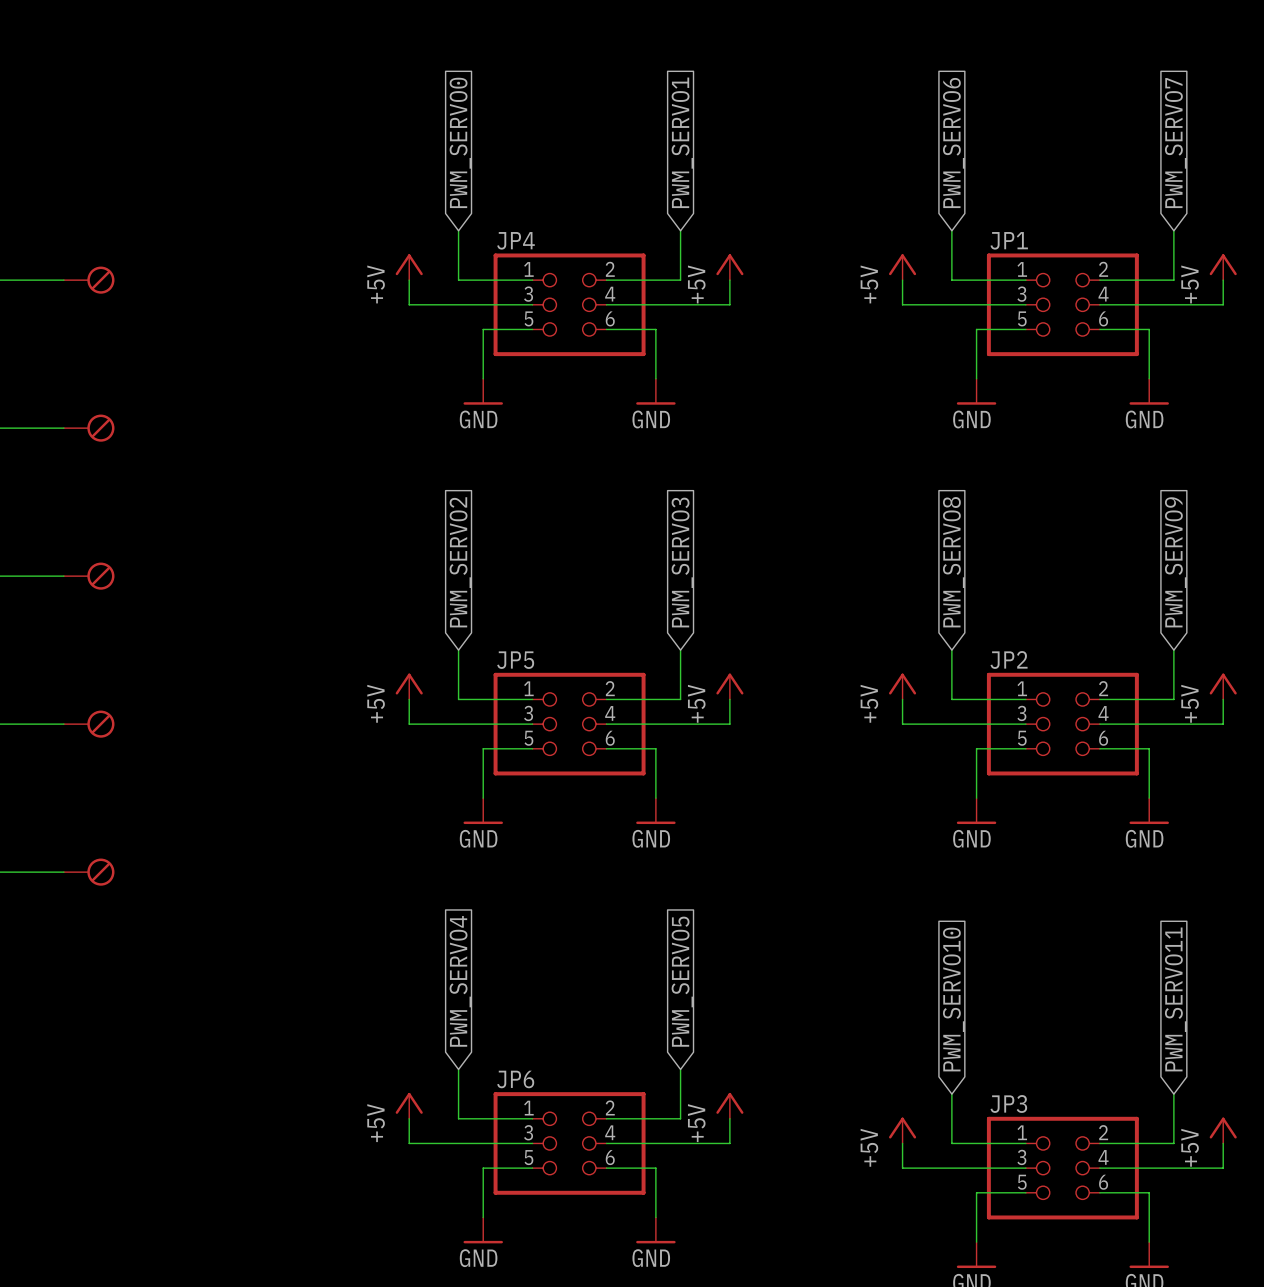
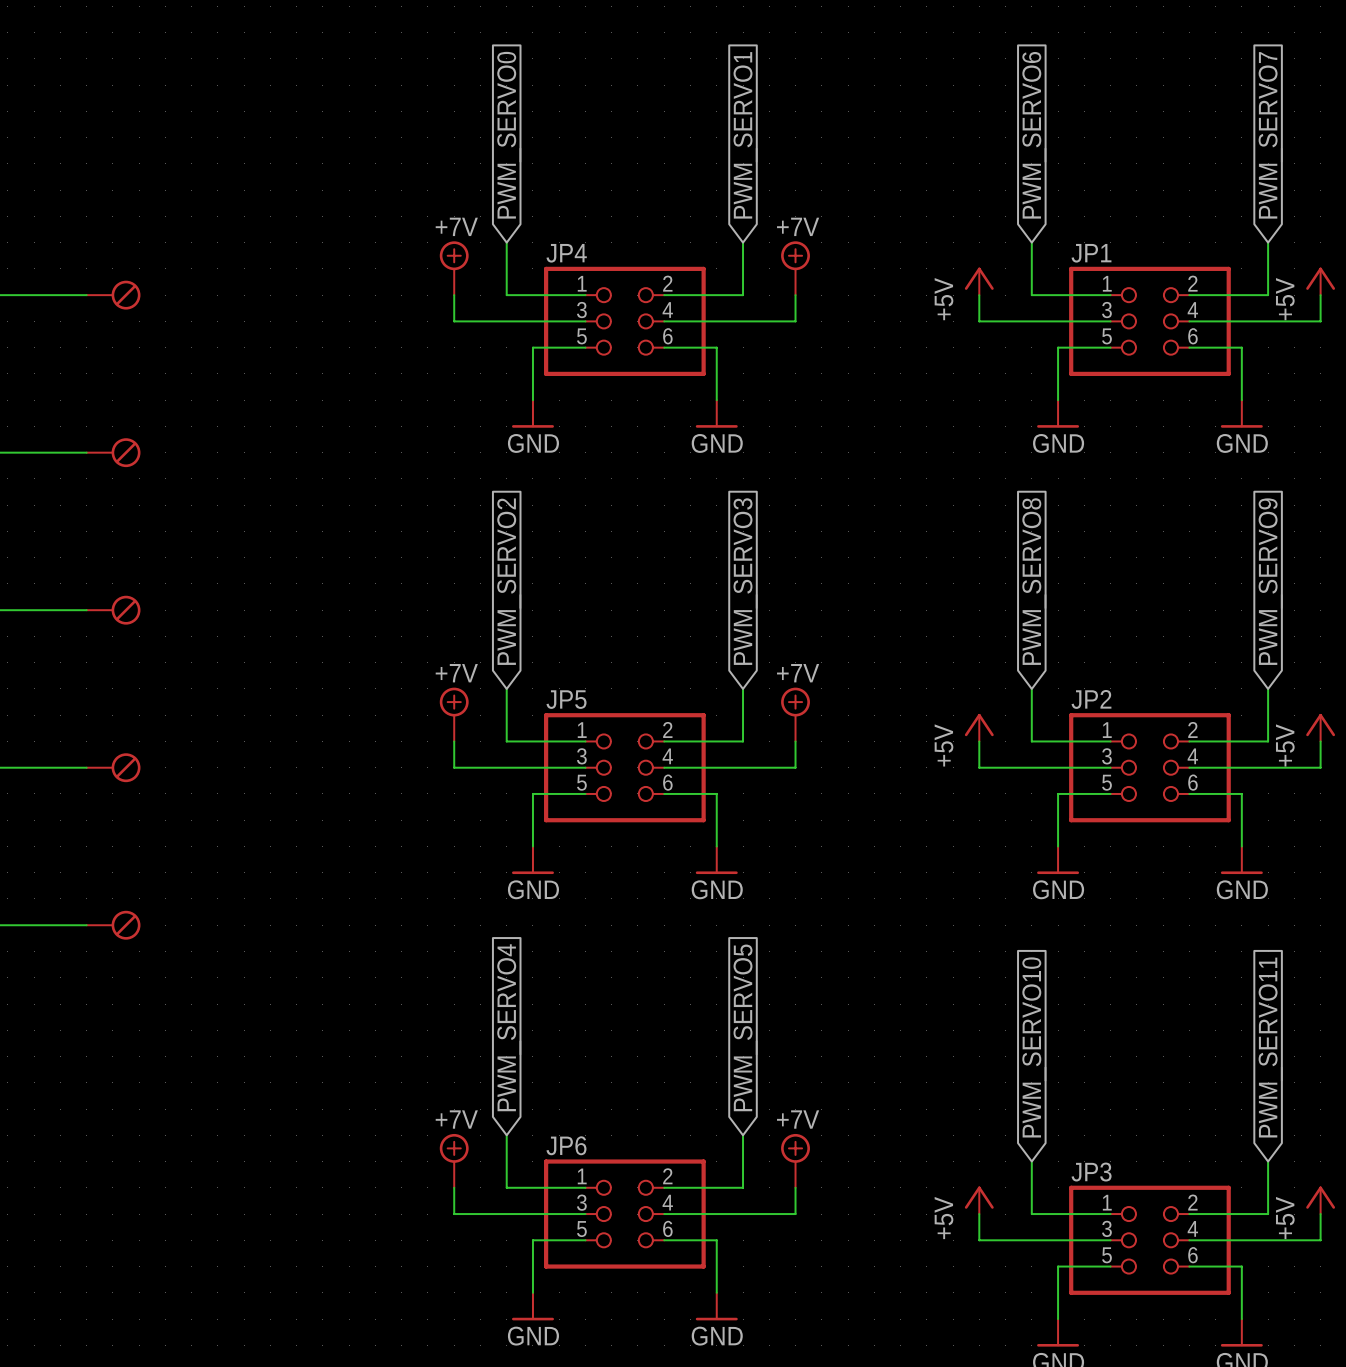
power symbol: none -> +7V (454, 268)
power symbol: none -> +7V (795, 268)
power symbol: +5V (409, 267) -> none
power symbol: +5V (729, 267) -> none
power symbol: none -> +7V (454, 714)
power symbol: none -> +7V (795, 714)
power symbol: +5V (409, 686) -> none
power symbol: +5V (729, 686) -> none
power symbol: none -> +7V (454, 1160)
power symbol: none -> +7V (795, 1160)
power symbol: +5V (409, 1105) -> none
power symbol: +5V (729, 1105) -> none

